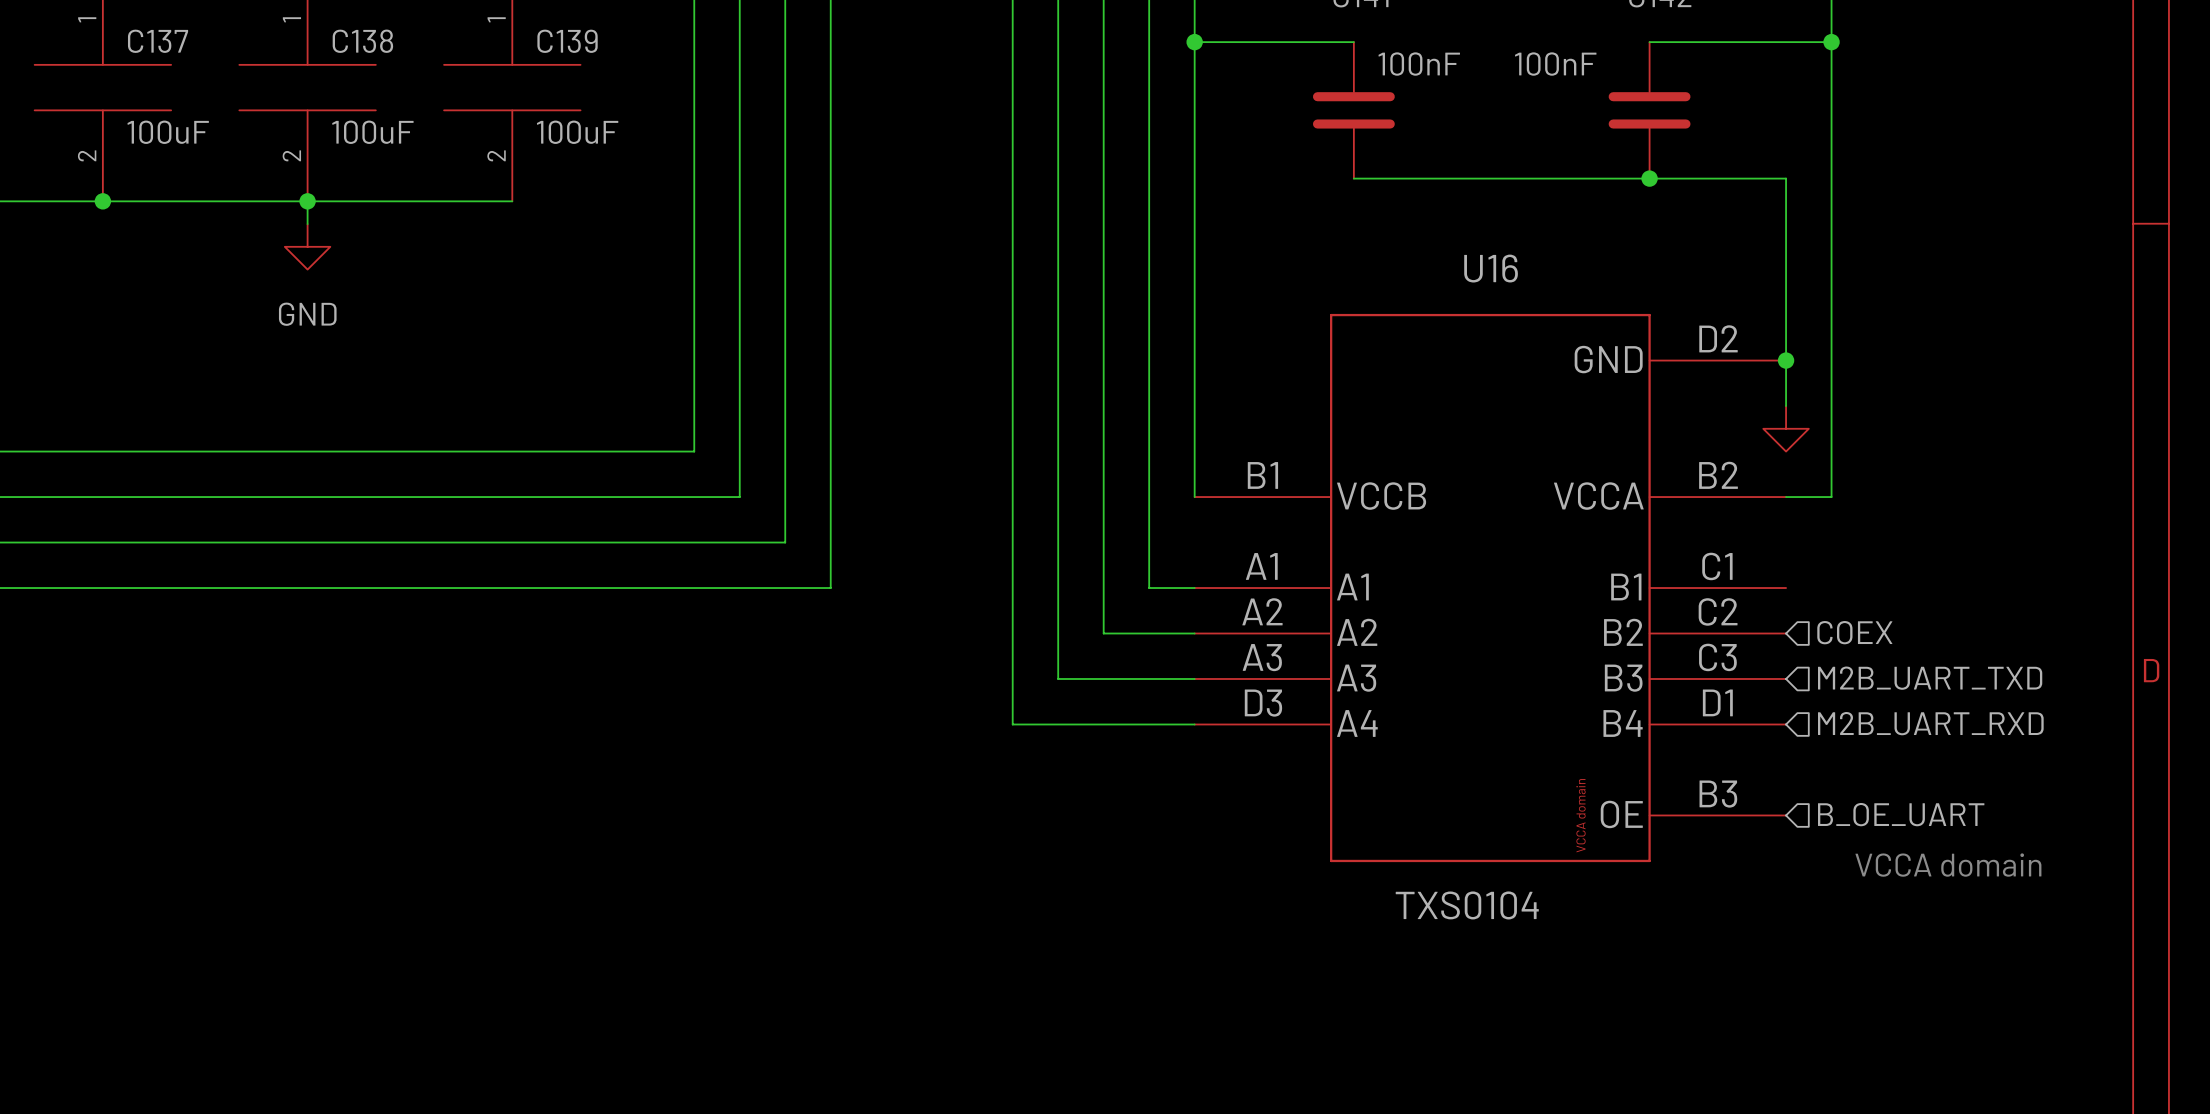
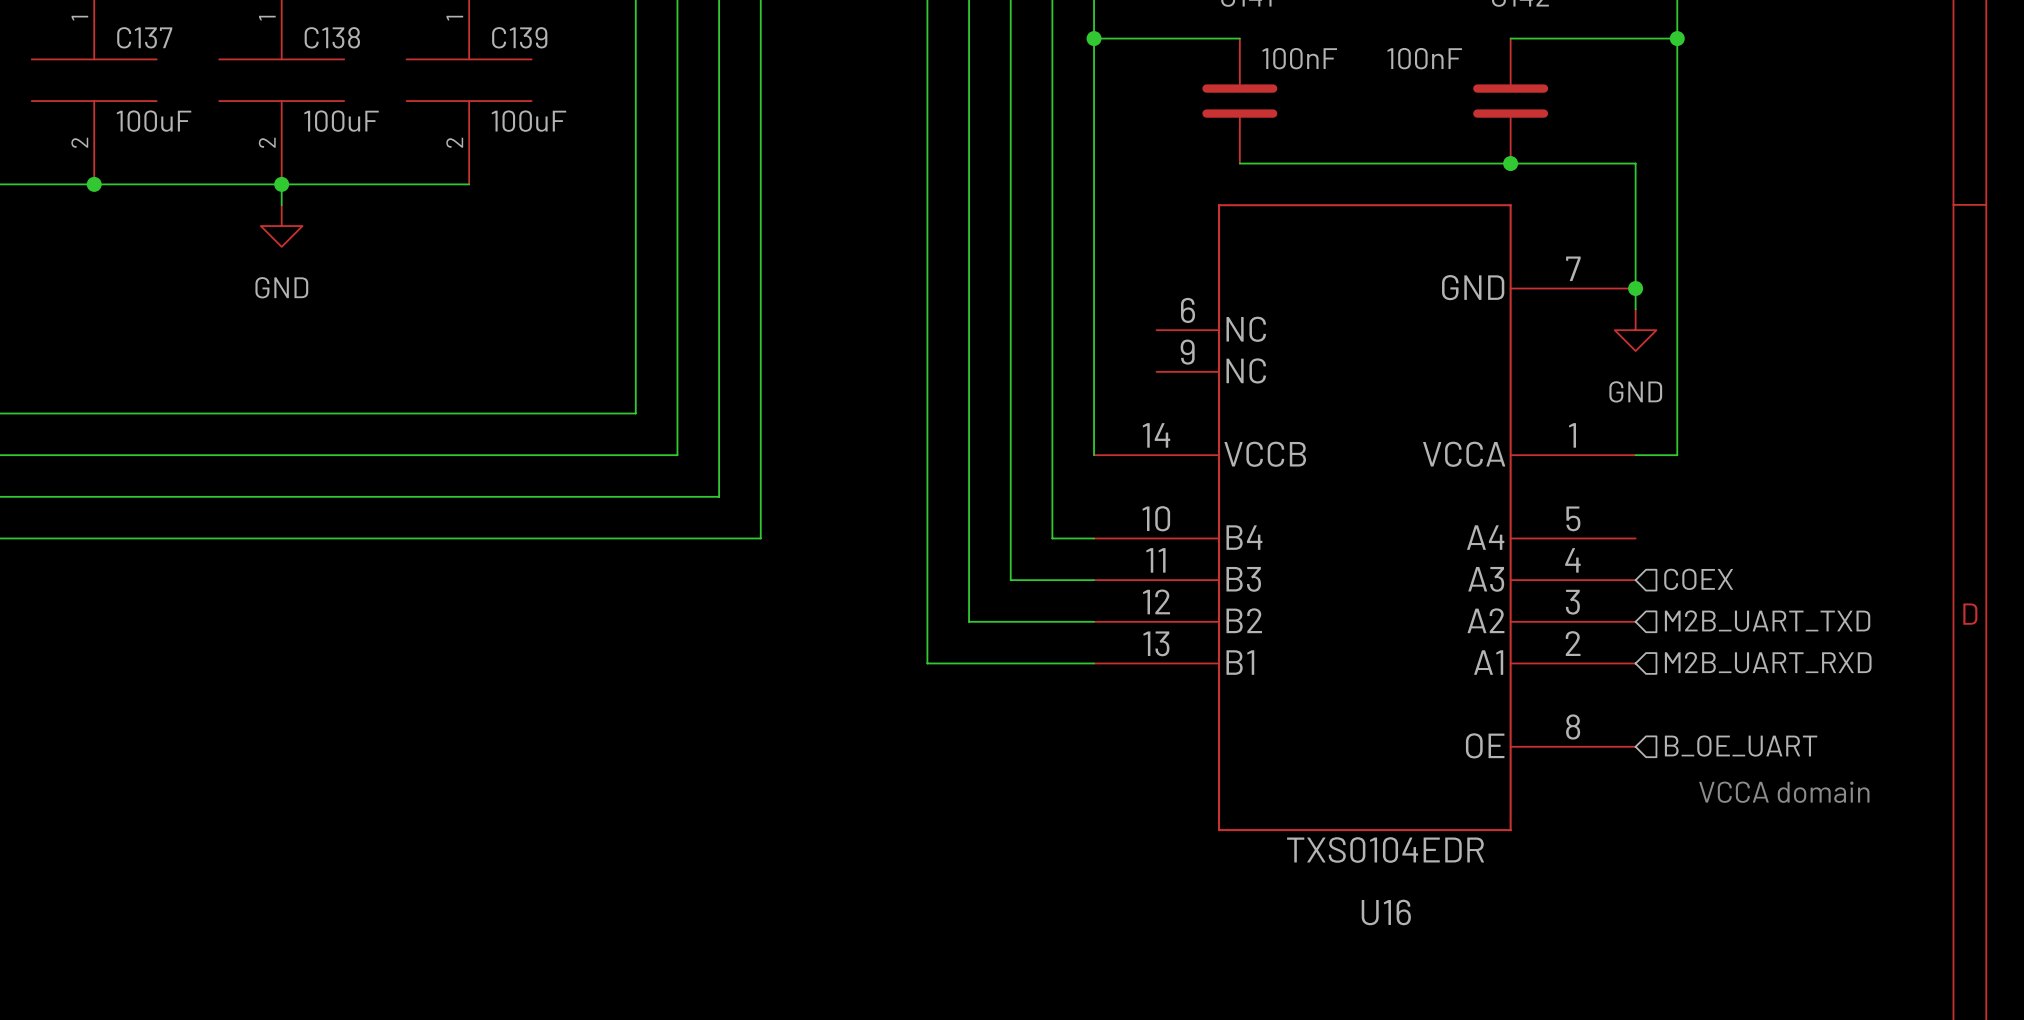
U16 name position: U16 (1491, 268) -> U16 (1386, 912)
U16 symbol: [1194, 313, 1787, 863] -> [1094, 204, 1636, 832]
wire: (1786, 337) (1786, 406) -> none
junction position: (1786, 360) -> (1635, 288)
power symbol: none -> GND (1635, 330)
power symbol: (1786, 428) -> none
U16 value: TXS0104 (1467, 905) -> TXS0104EDR (1385, 850)

